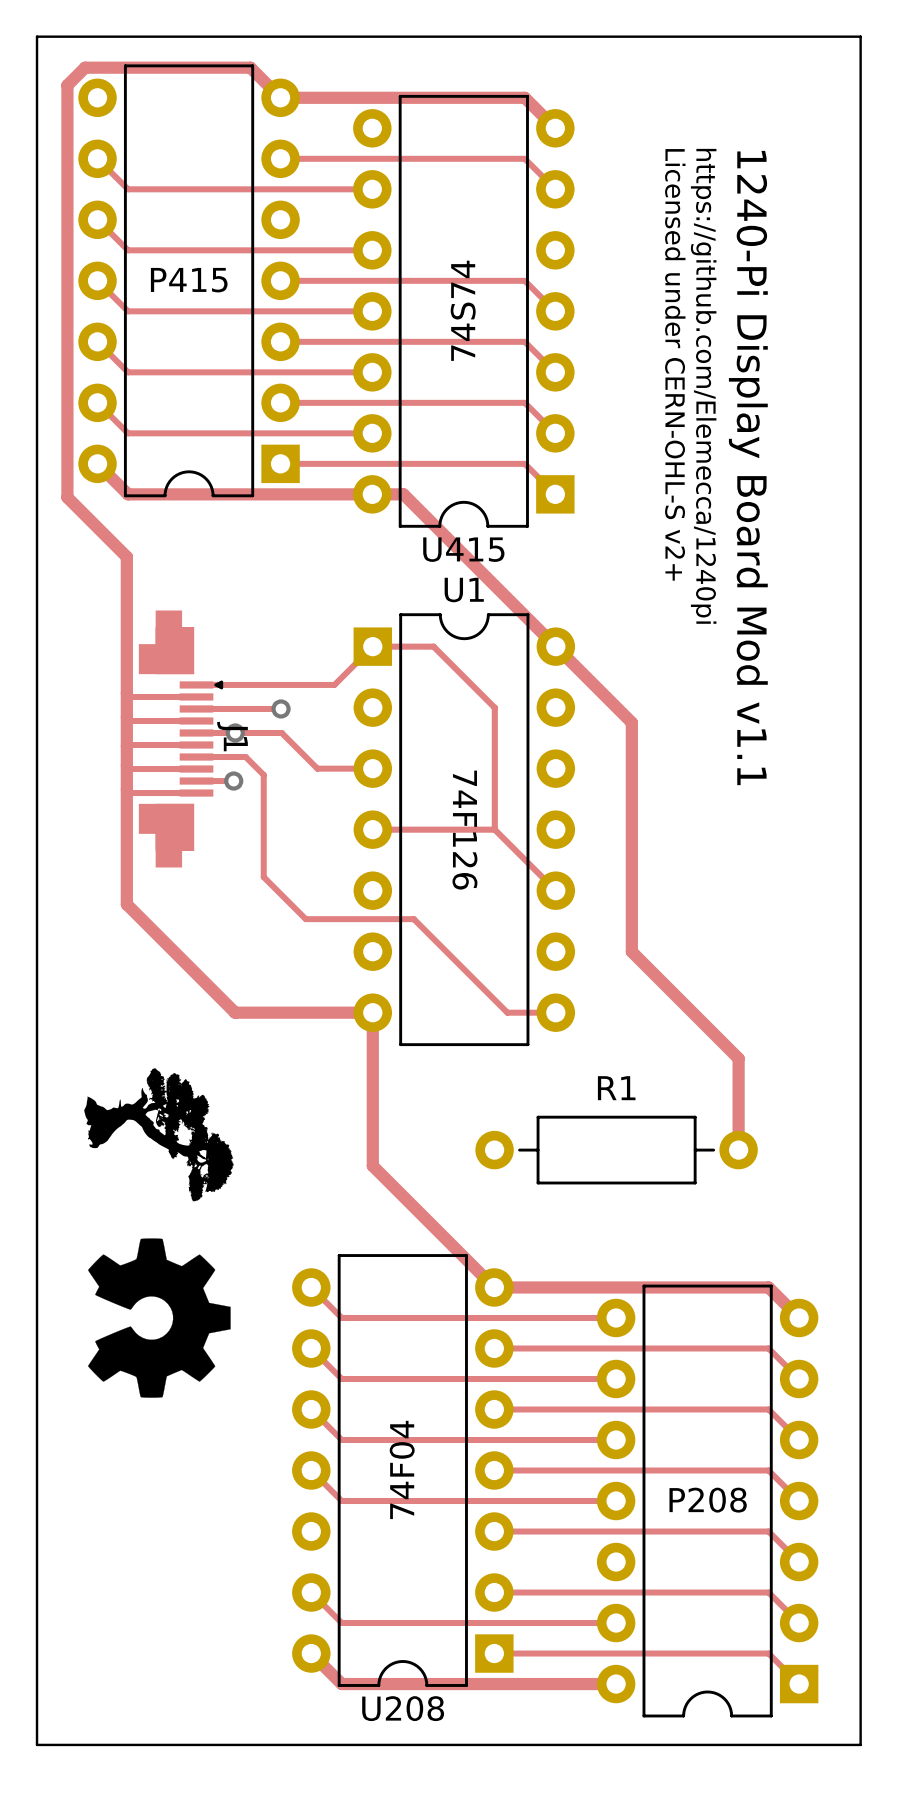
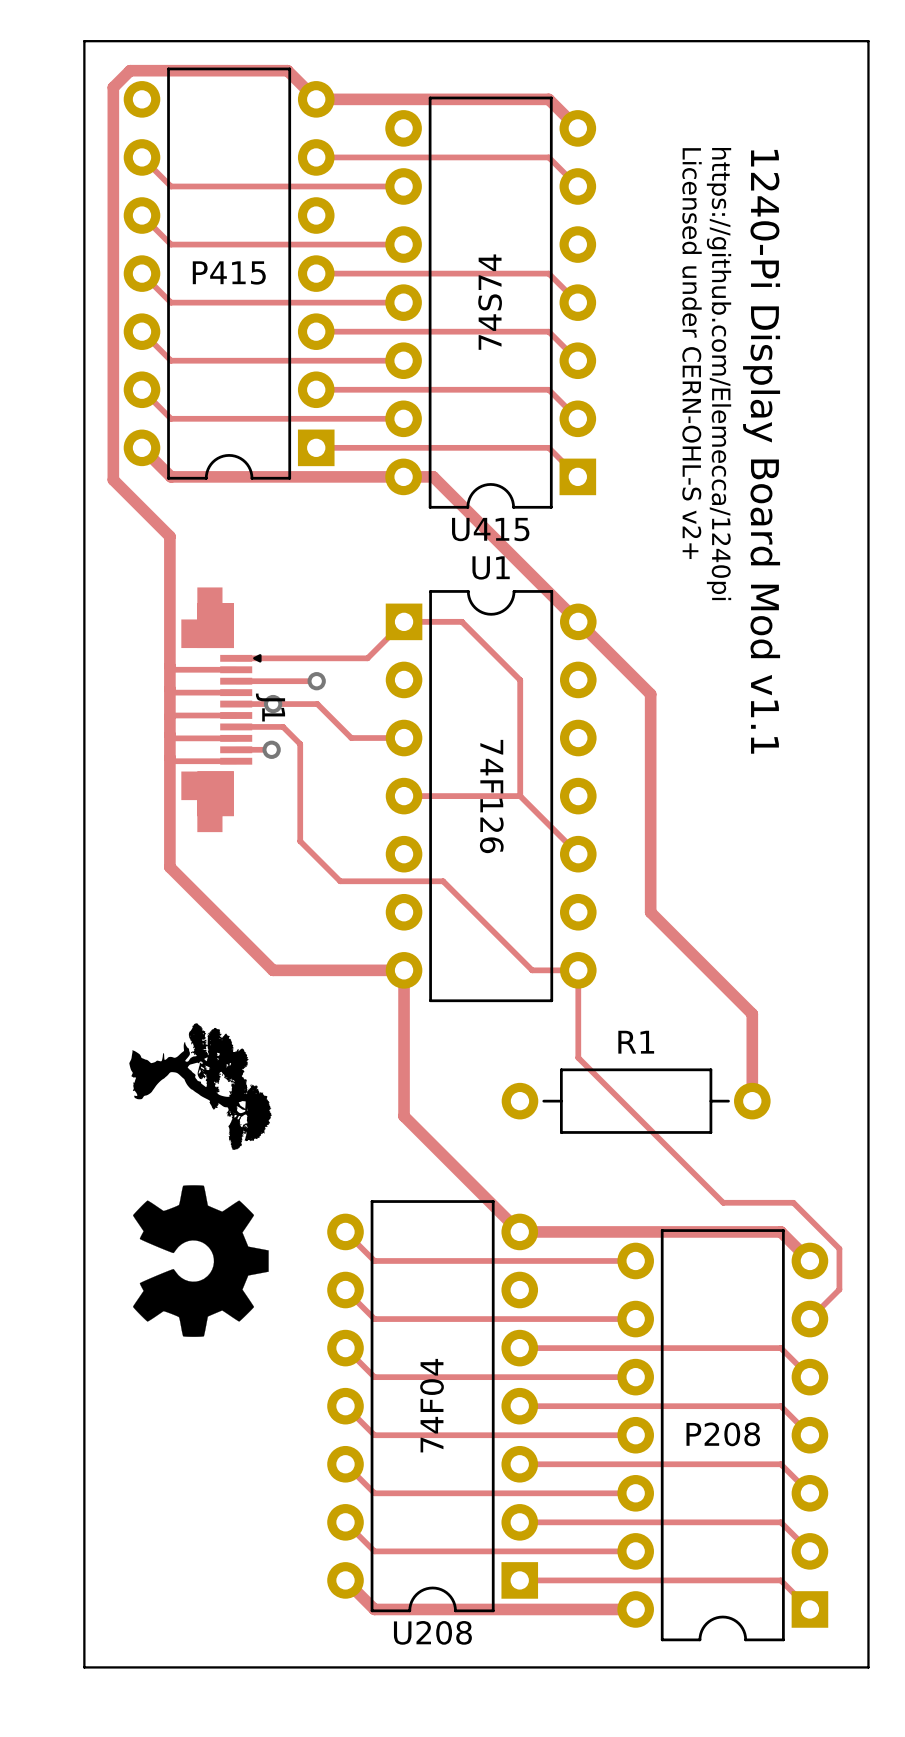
track: (494, 1348) (768, 1348) (799, 1378) -> (578, 970) (578, 1057) (723, 1202) (793, 1202) (839, 1248) (839, 1289) (809, 1319)
track: none -> (345, 1464) (374, 1493) (635, 1493)

